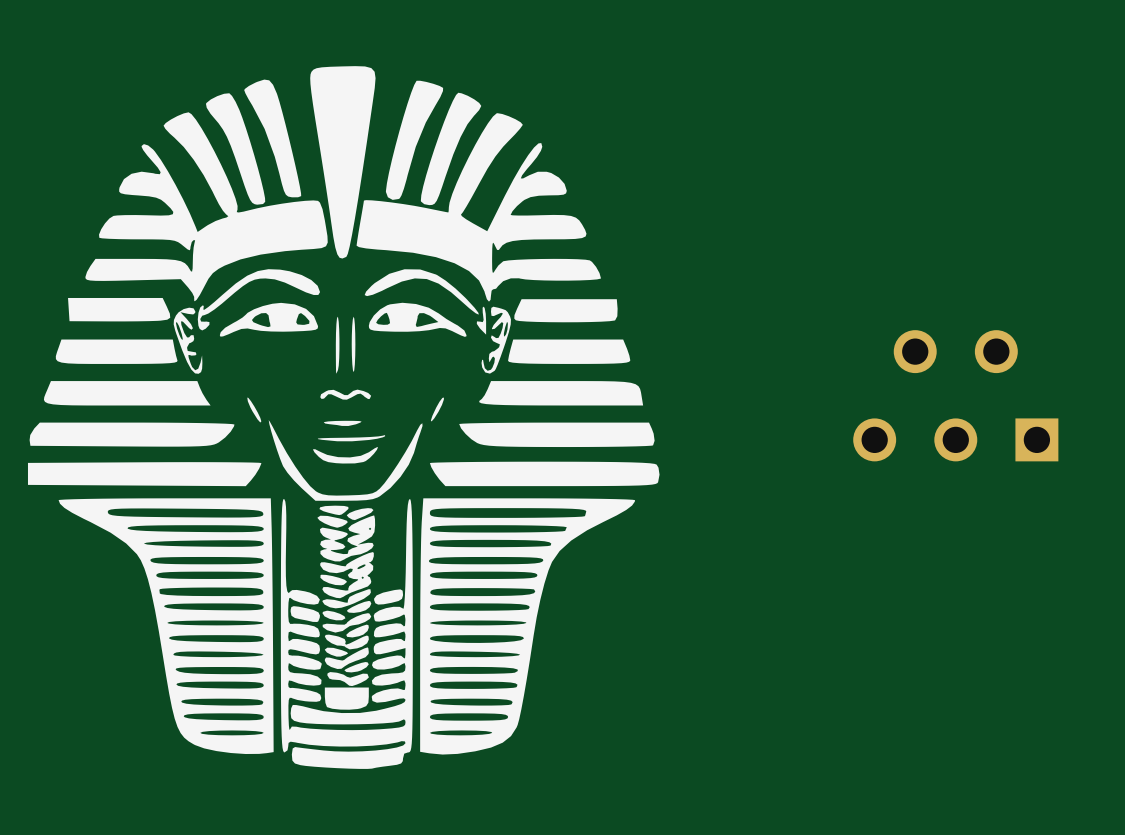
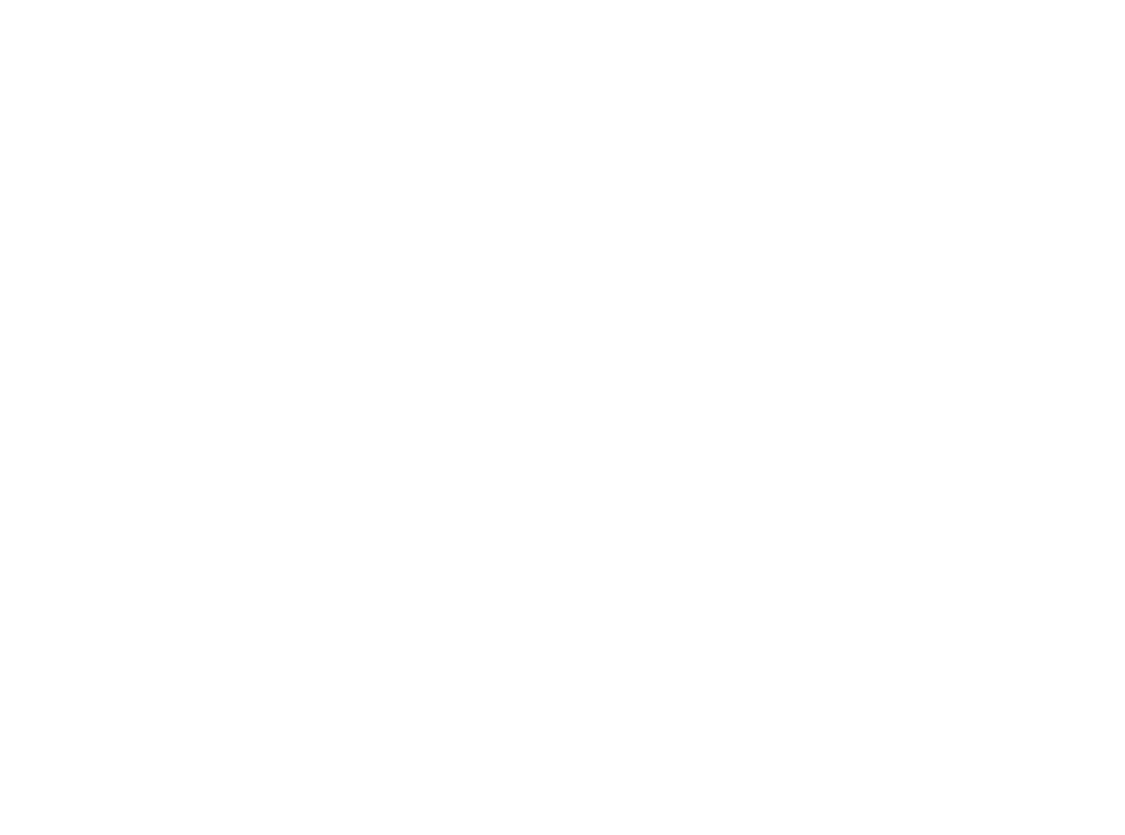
drawing: [27, 66, 660, 769] -> none
part: (955, 395) -> none

